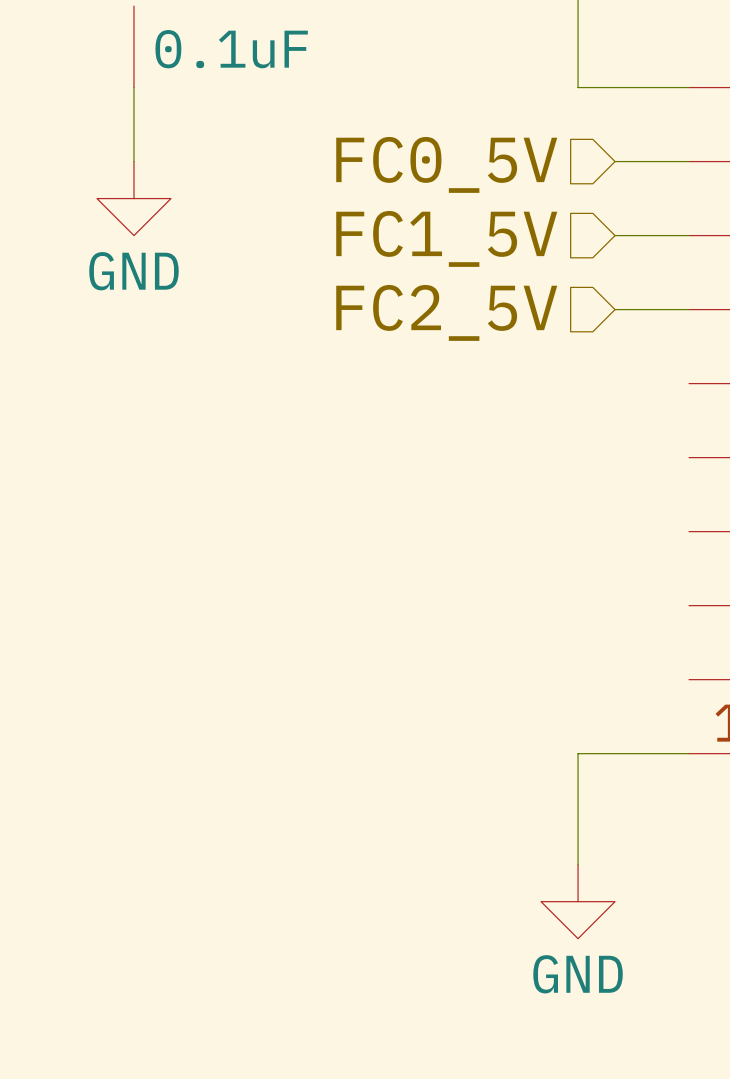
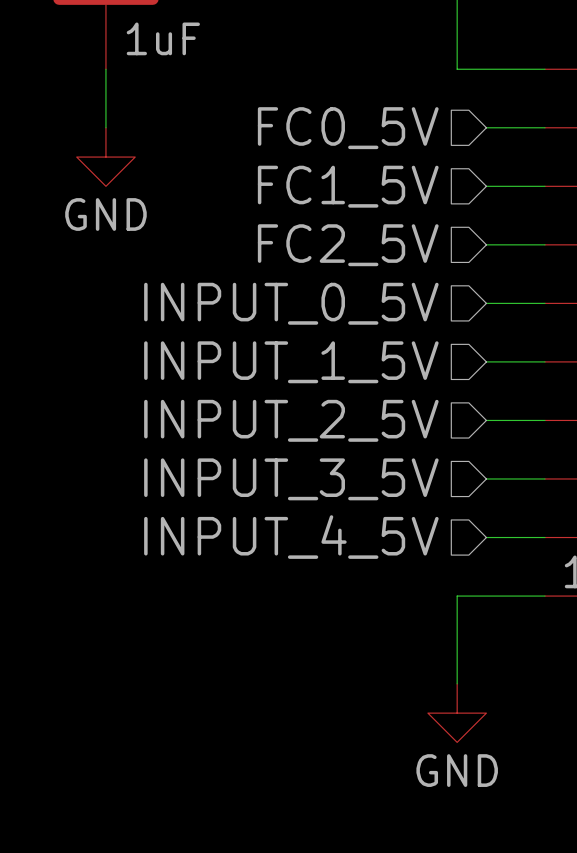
part value: 0.1uF (231, 49) -> 1uF (163, 38)
wire: none -> (486, 303) (544, 303)
hierarchical label: none -> INPUT_0_5V (291, 303)
wire: none -> (486, 361) (544, 361)
hierarchical label: none -> INPUT_1_5V (291, 362)
wire: none -> (486, 420) (544, 420)
hierarchical label: none -> INPUT_2_5V (291, 420)
wire: none -> (486, 478) (544, 478)
hierarchical label: none -> INPUT_3_5V (291, 479)
wire: none -> (486, 537) (544, 537)
hierarchical label: none -> INPUT_4_5V (291, 537)

